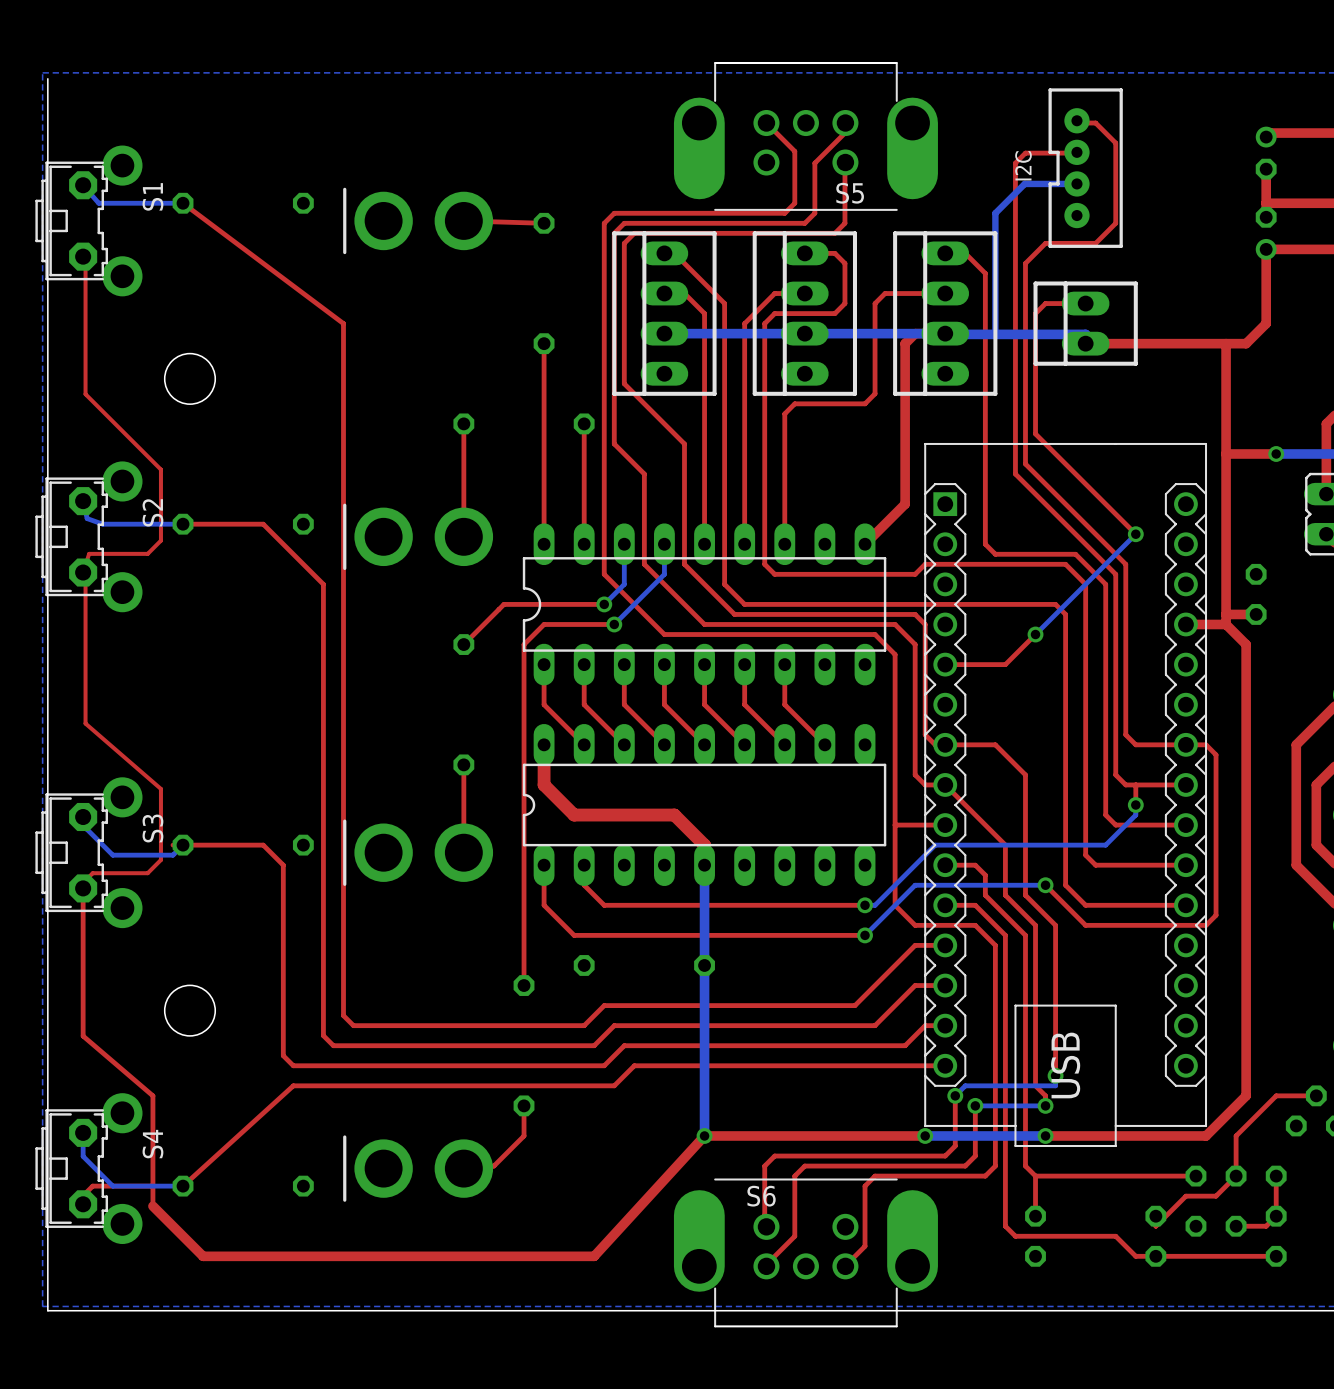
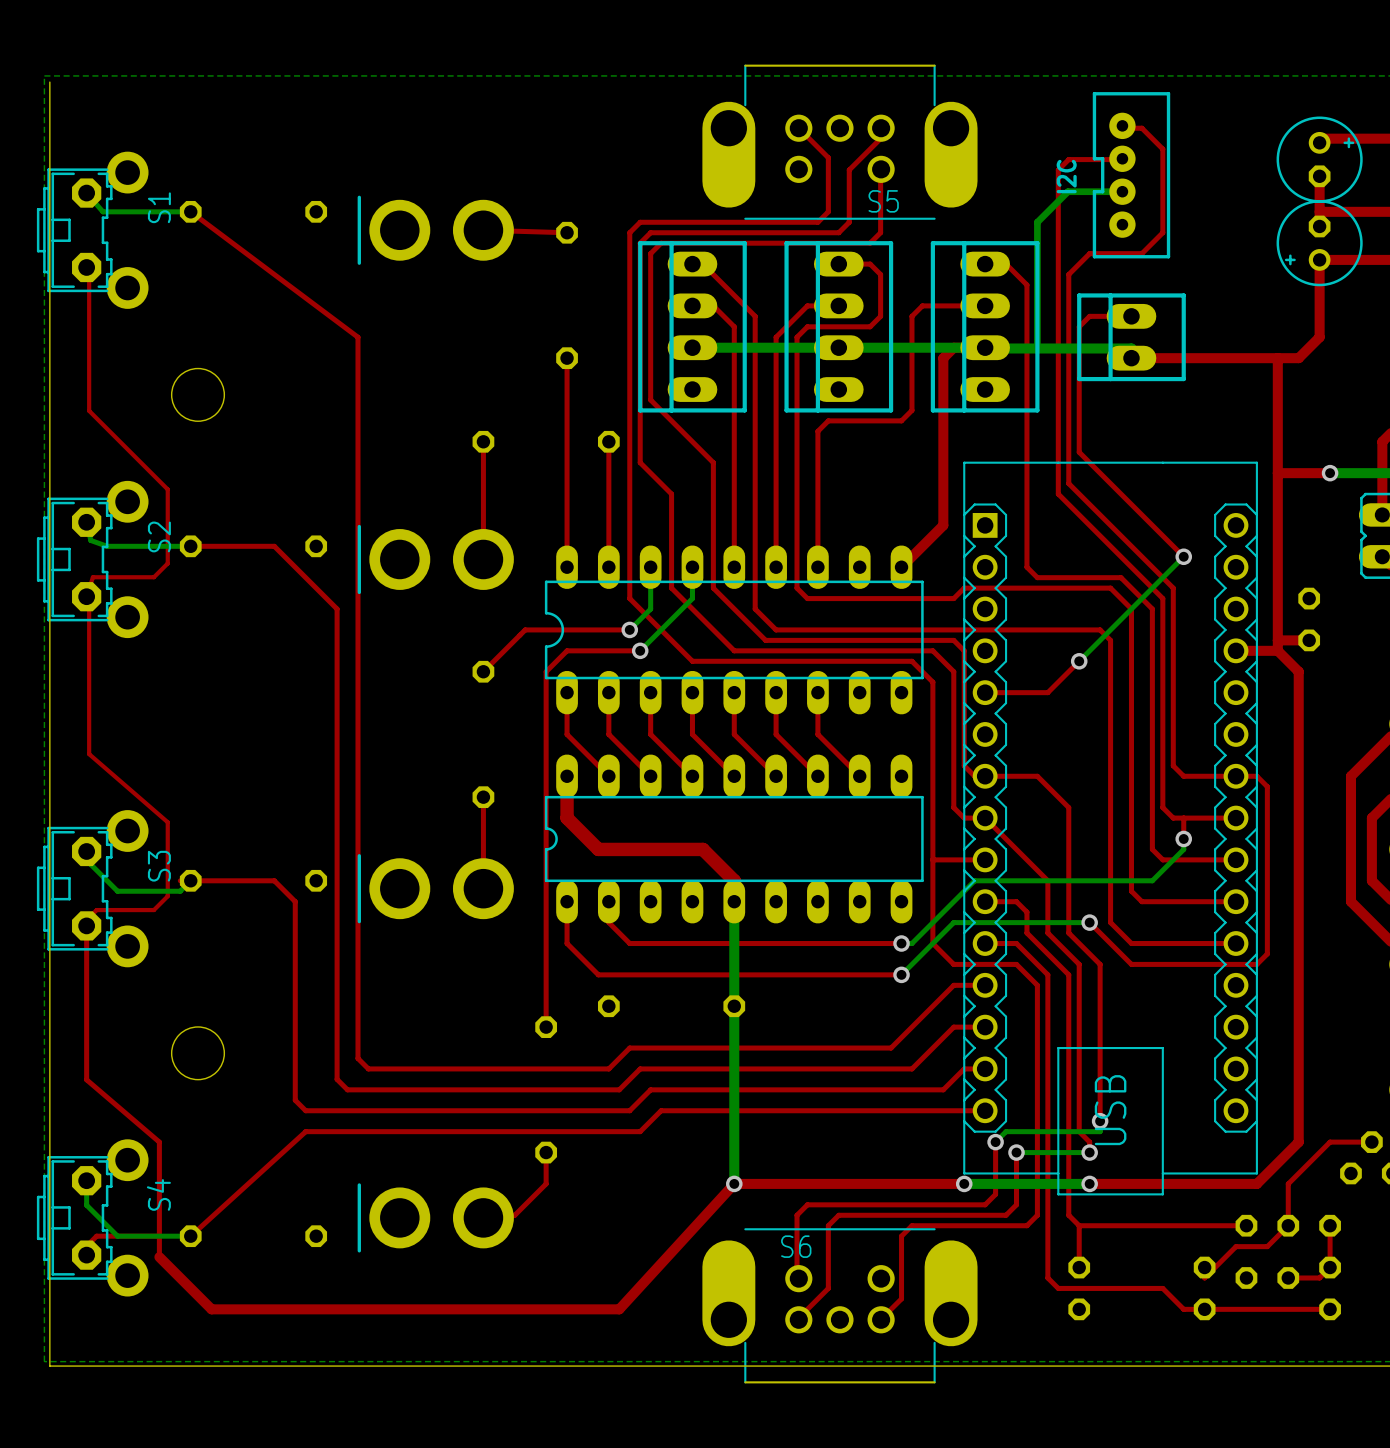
part side: top (1266, 153) -> bottom (1319, 159)
part side: top (1266, 233) -> bottom (1319, 243)

